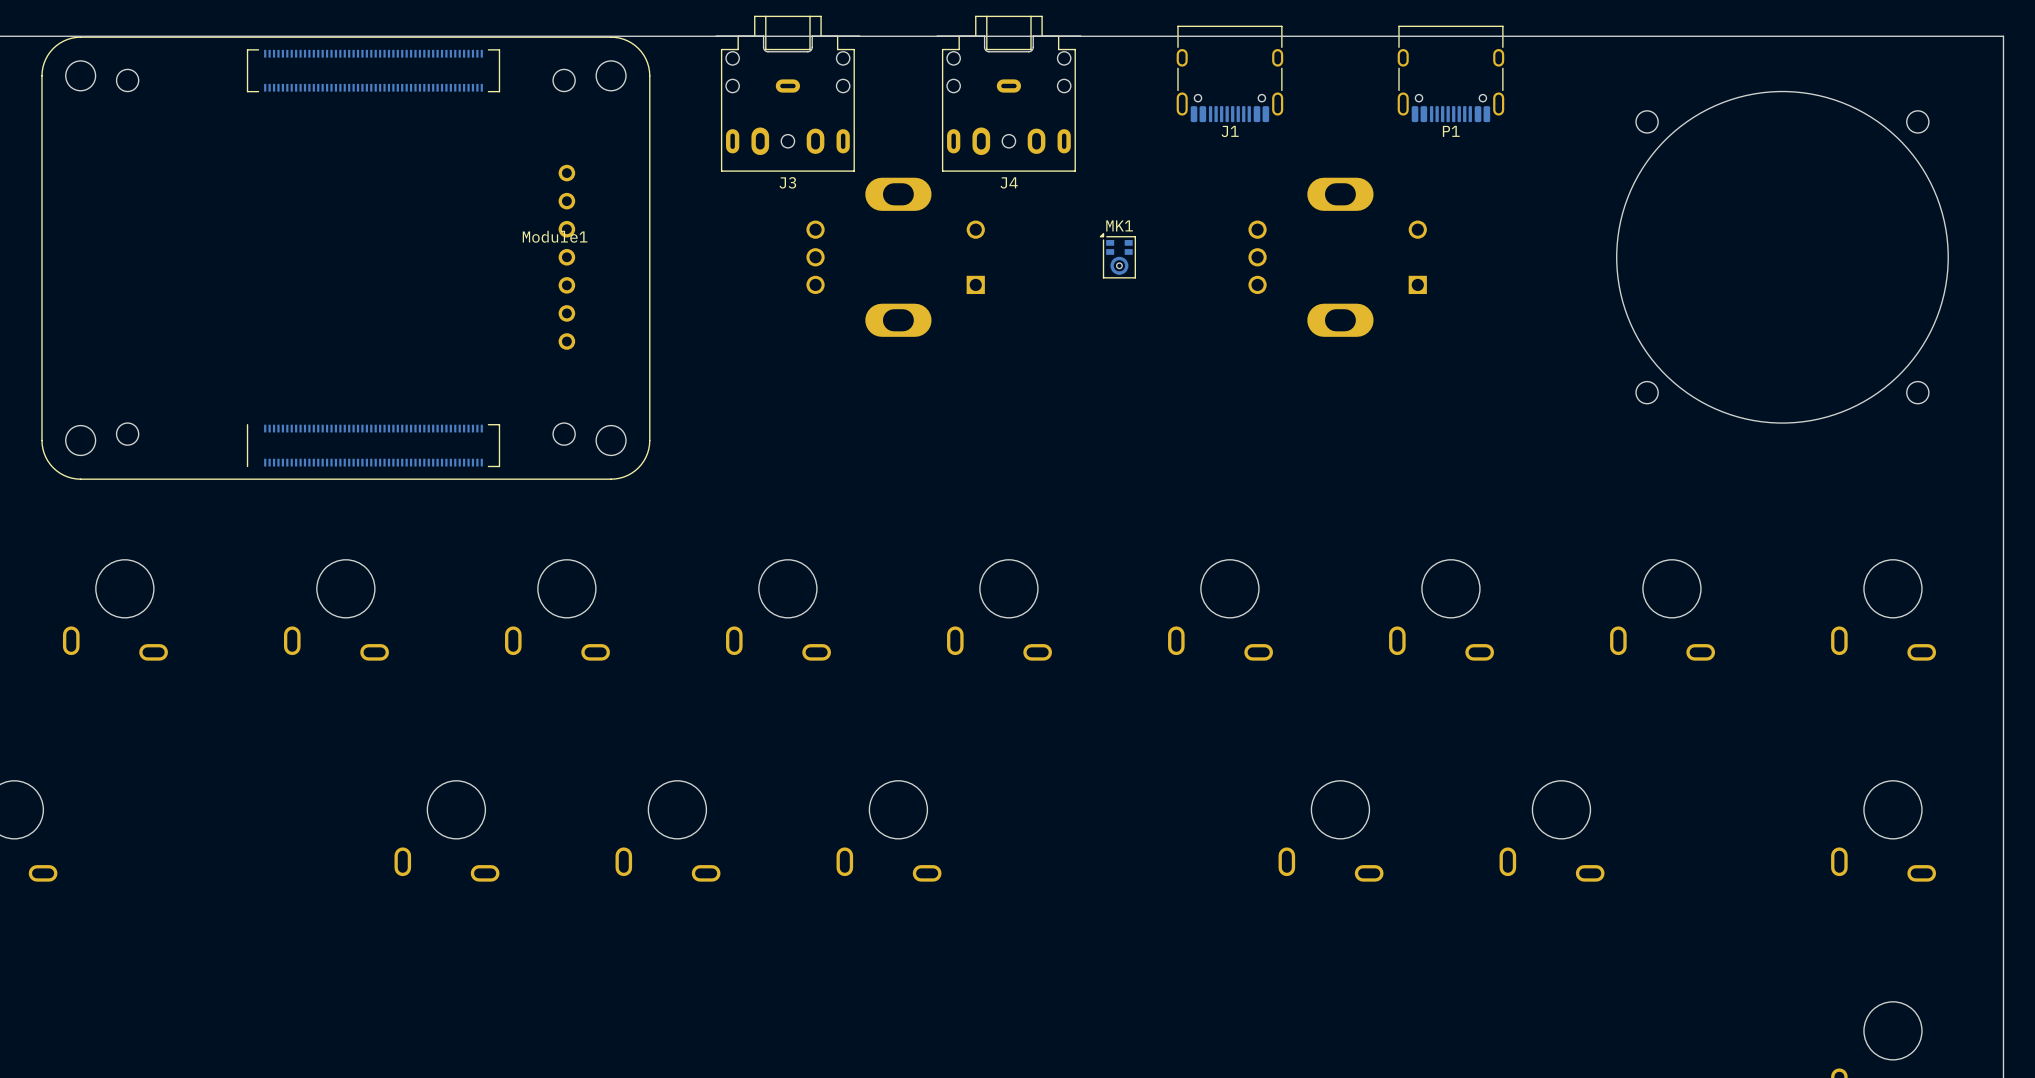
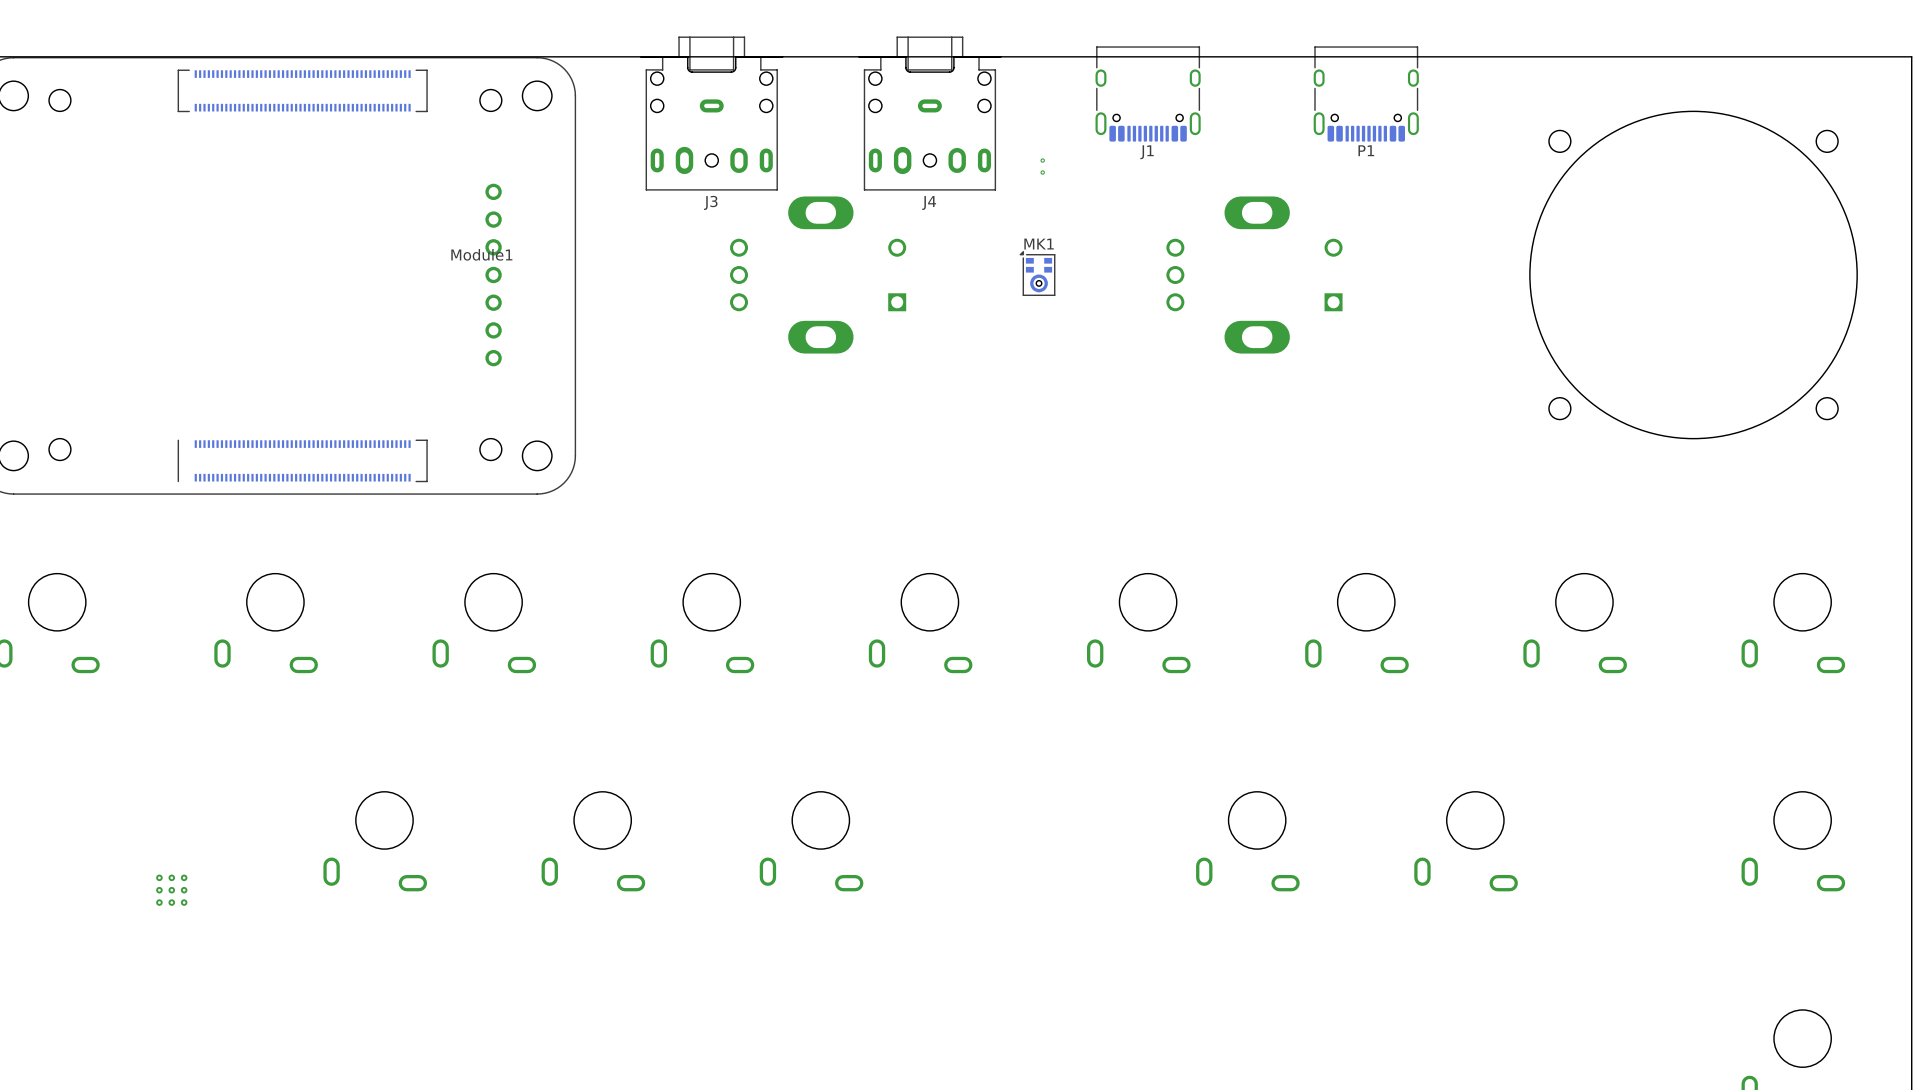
part: none -> (1042, 166)
part: none -> (171, 890)

